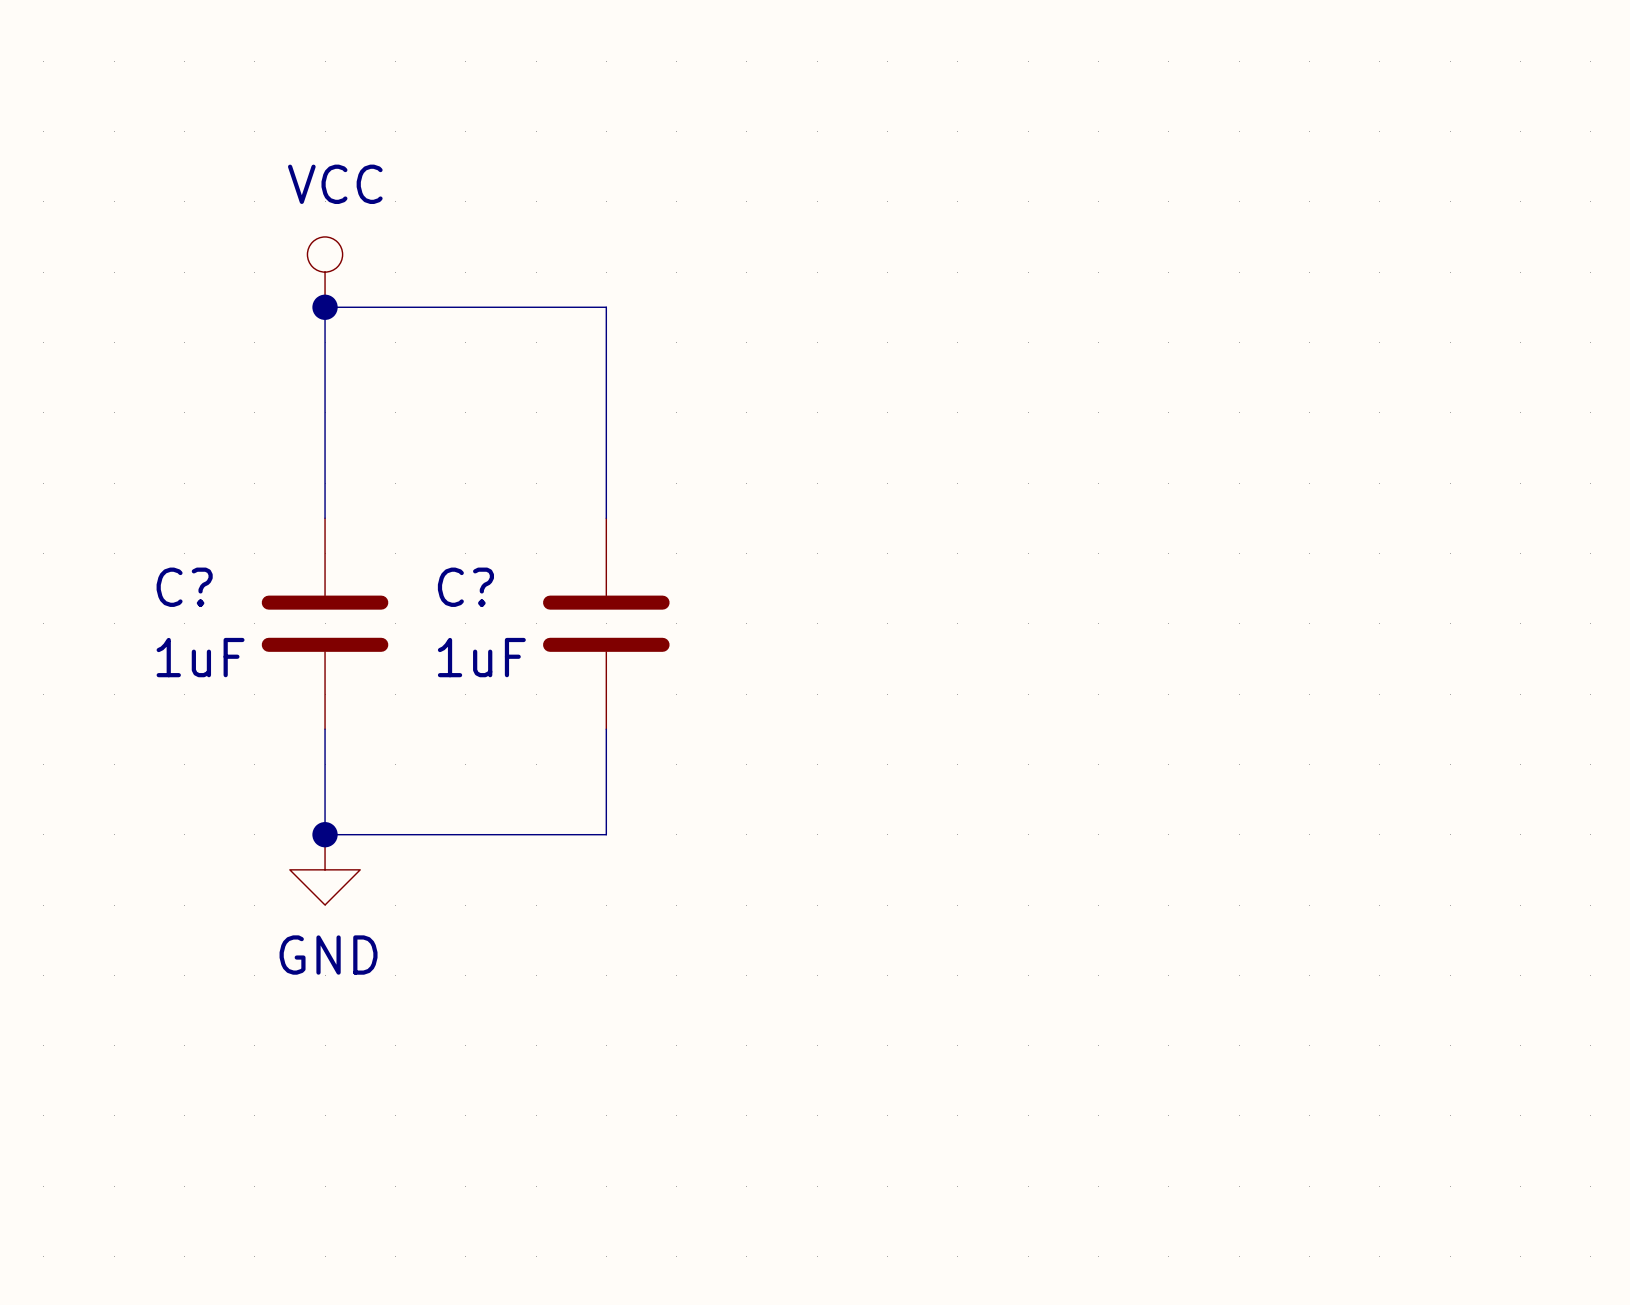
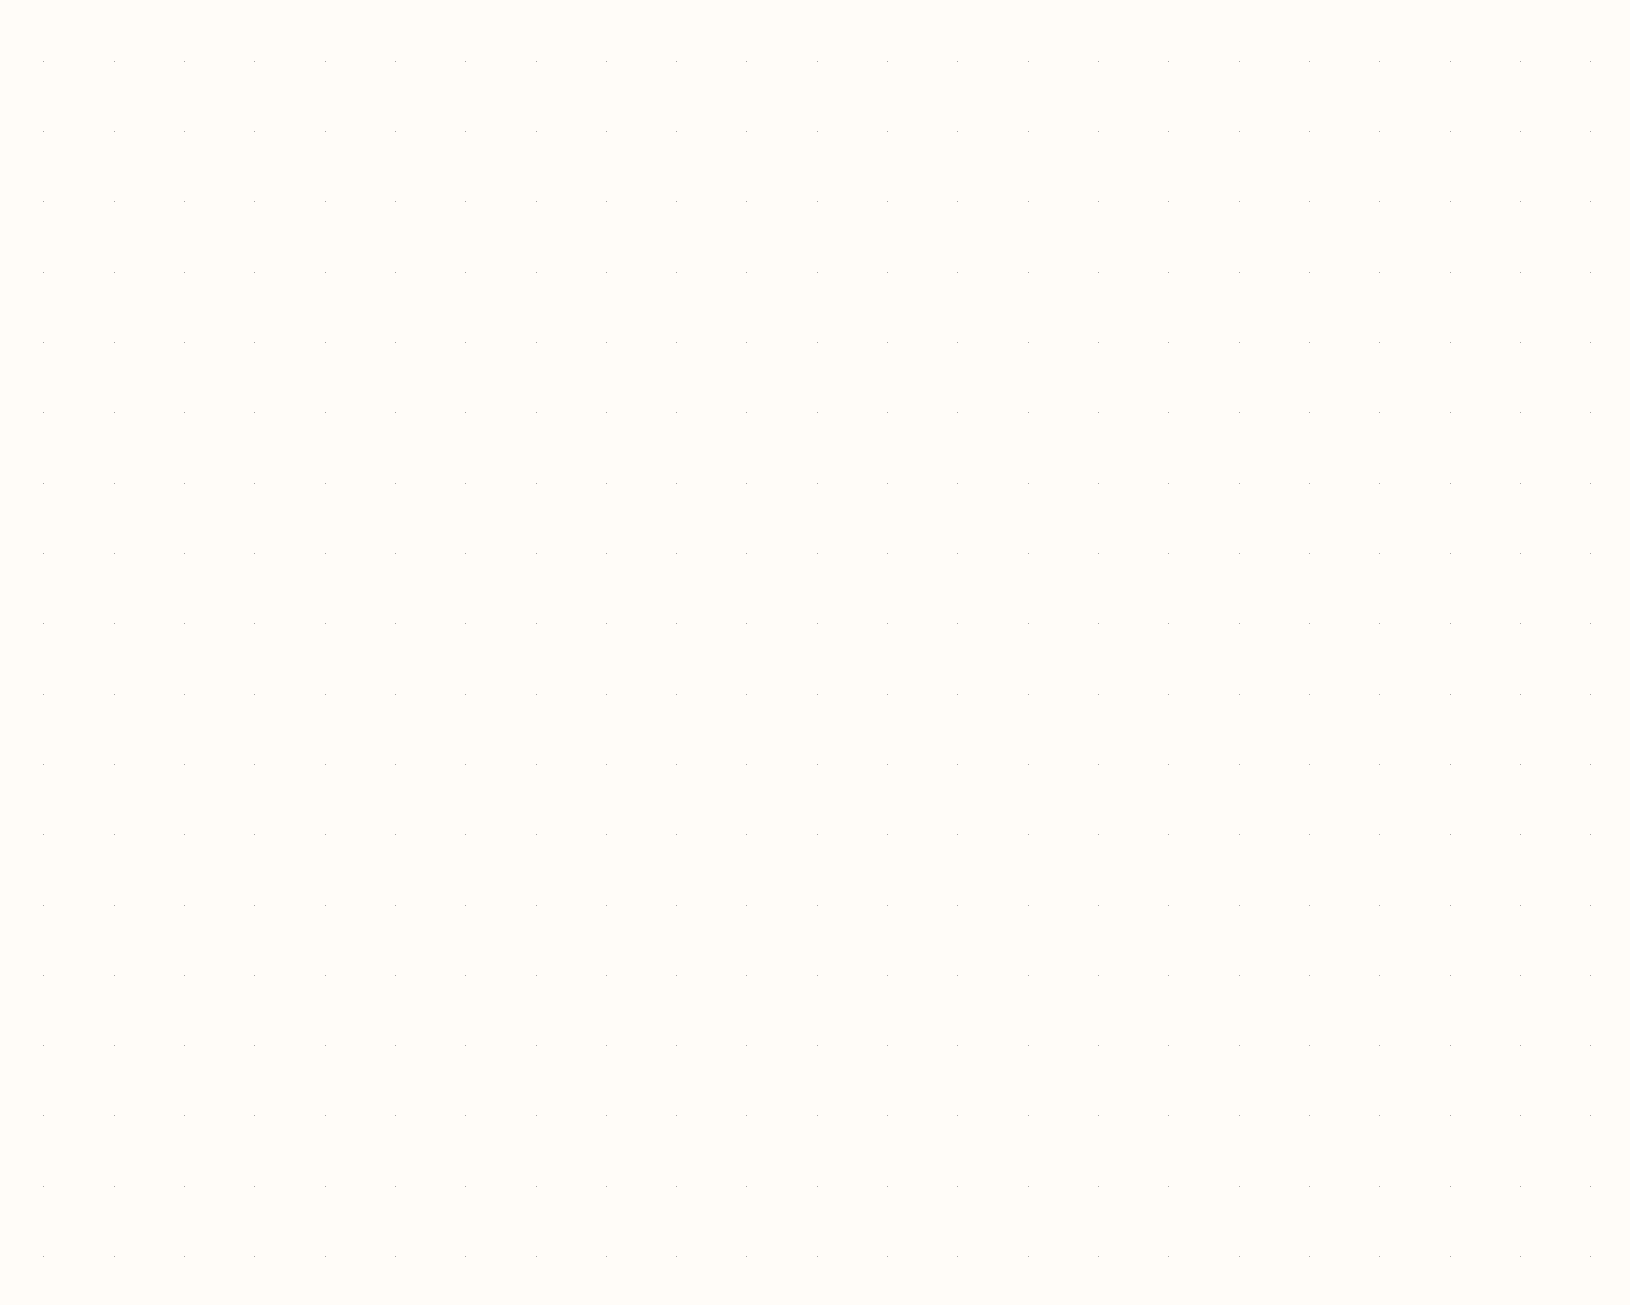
power symbol: VCC (325, 272) -> none
junction: (325, 307) -> none
wire: (325, 518) (325, 307) (606, 307) (606, 518) -> none
C?: 1uF (325, 623) -> none
C?: 1uF (606, 623) -> none
wire: (325, 729) (325, 834) (606, 834) (606, 729) -> none
junction: (325, 834) -> none
power symbol: GND (325, 869) -> none

